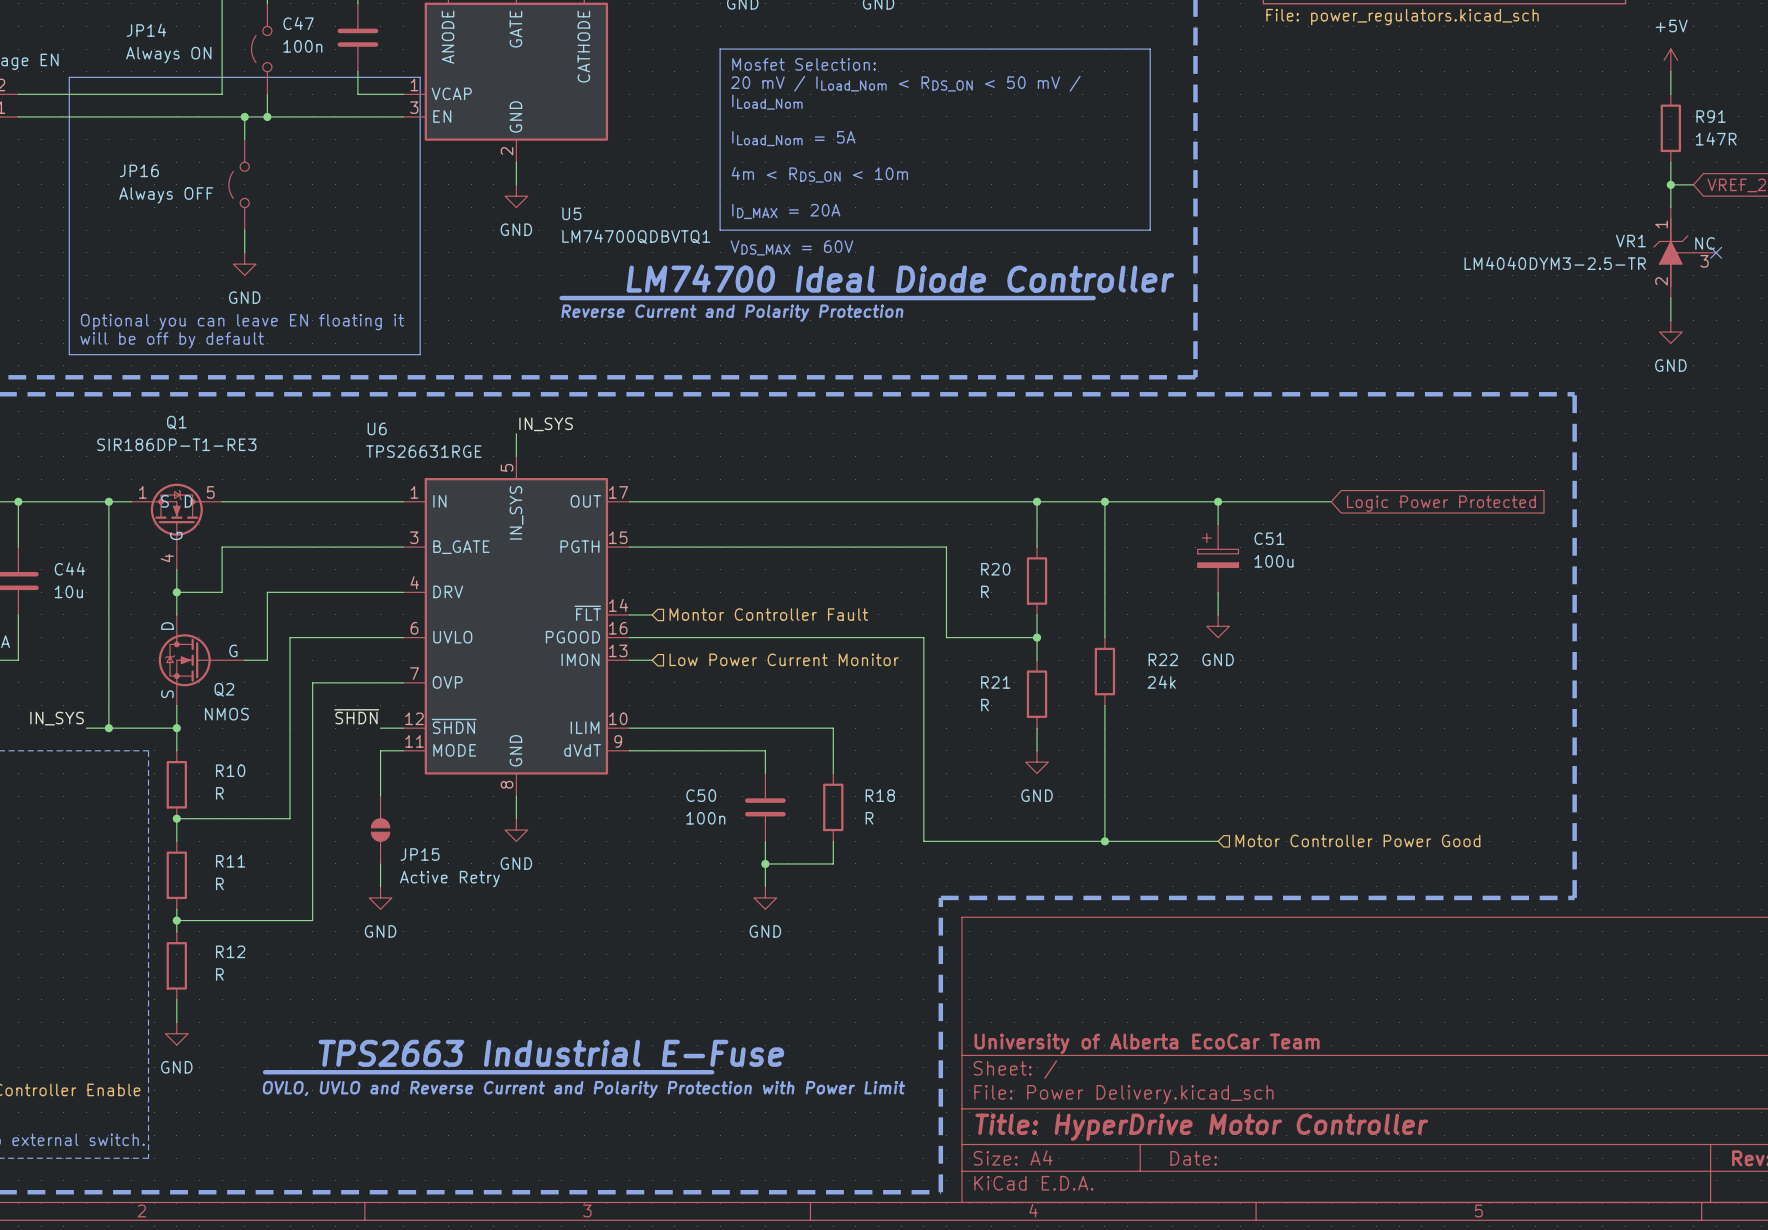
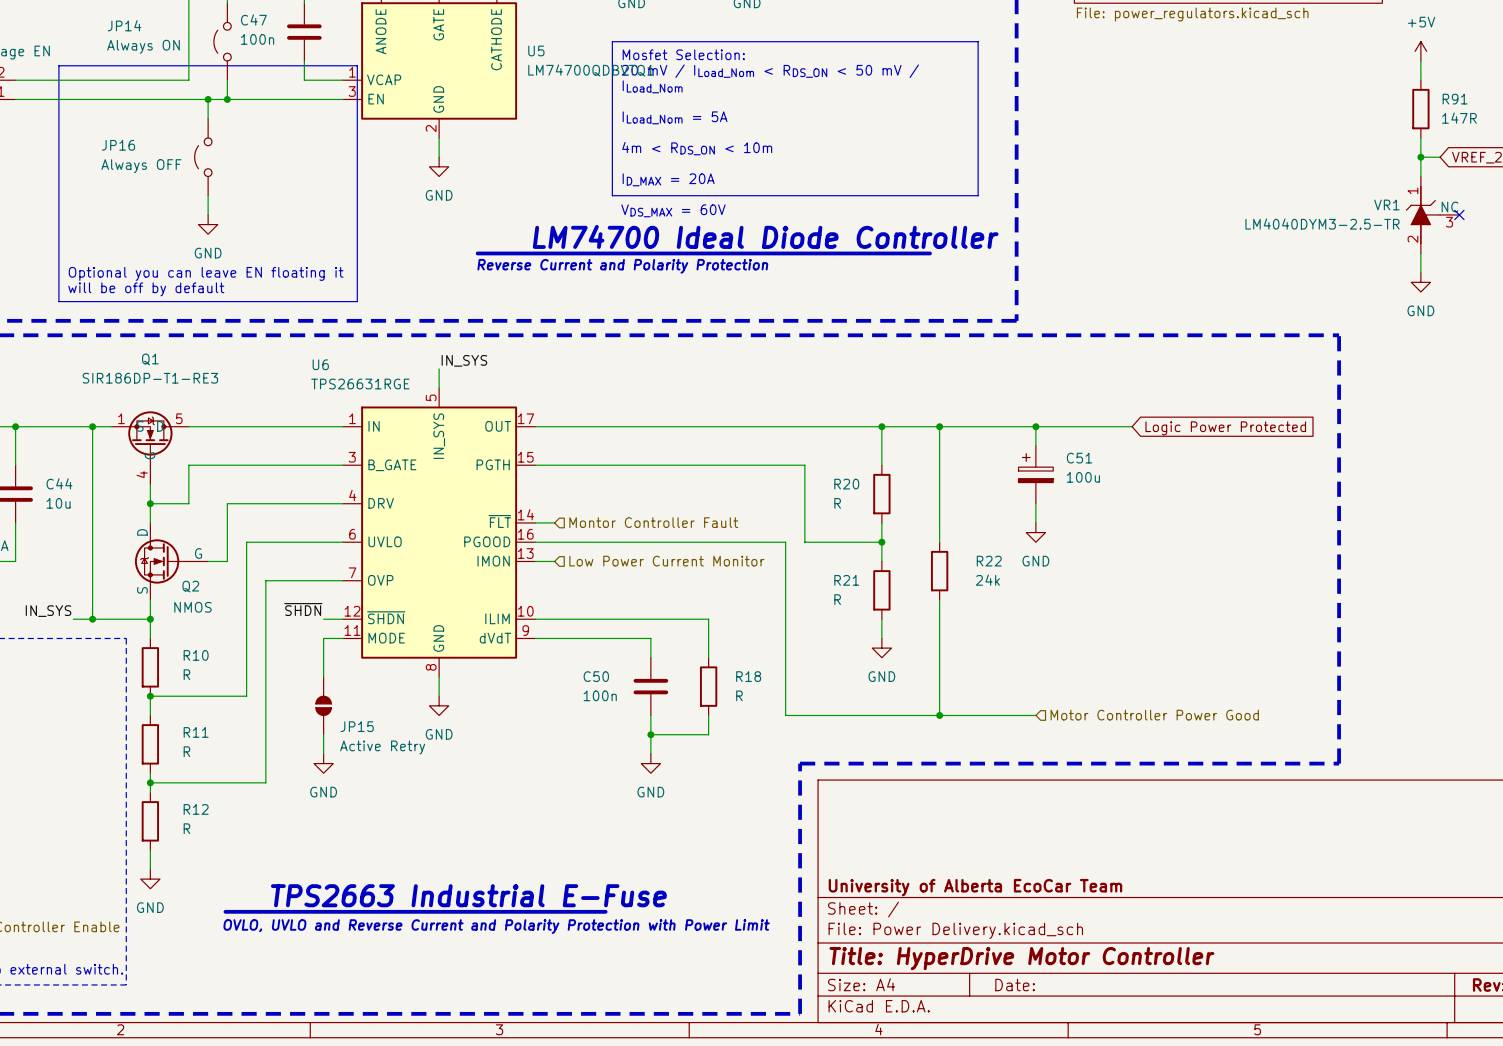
U5 name position: U5 (571, 213) -> U5 (536, 50)
U5 value position: LM74700QDBVTQ1 (636, 236) -> LM74700QDBVTQ1 (591, 70)

